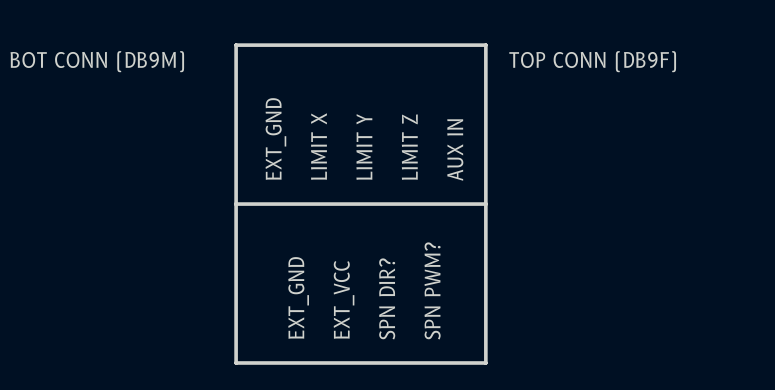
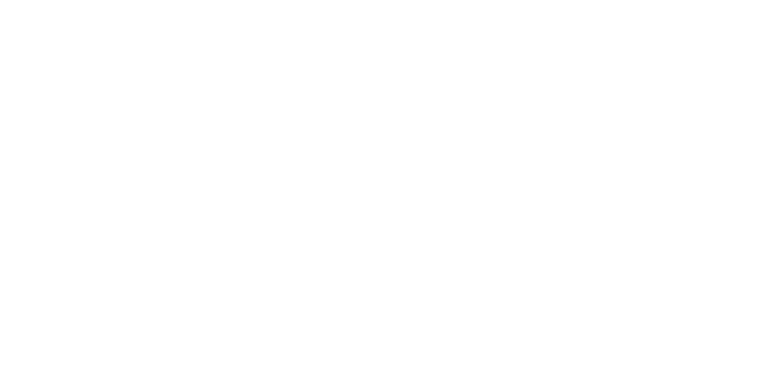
board edge: (236, 45) (236, 362) (485, 362) (485, 45) (236, 45) -> none
text: BOT CONN (DB9M) (97, 61) -> none
text: TOP CONN (DB9F) (592, 61) -> none
text: EXT_GND (275, 139) -> none
text: LIMIT X (318, 146) -> none
text: LIMIT Y (364, 147) -> none
text: LIMIT Z (409, 147) -> none
text: AUX IN (455, 150) -> none
board edge: (236, 204) (485, 204) -> none
text: SPN PWM? (432, 290) -> none
text: EXT_GND (298, 297) -> none
text: SPN DIR? (387, 298) -> none
text: EXT_VCC (344, 299) -> none

